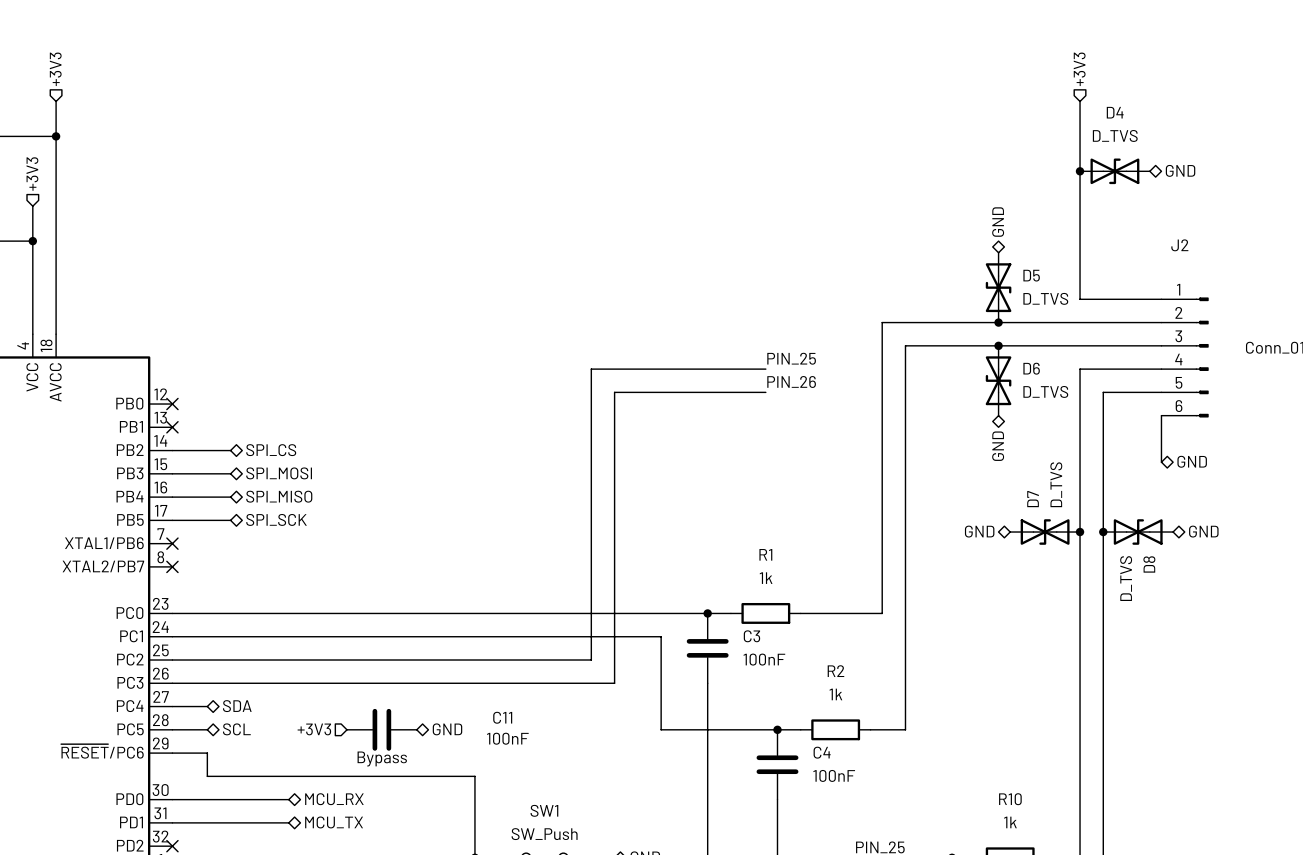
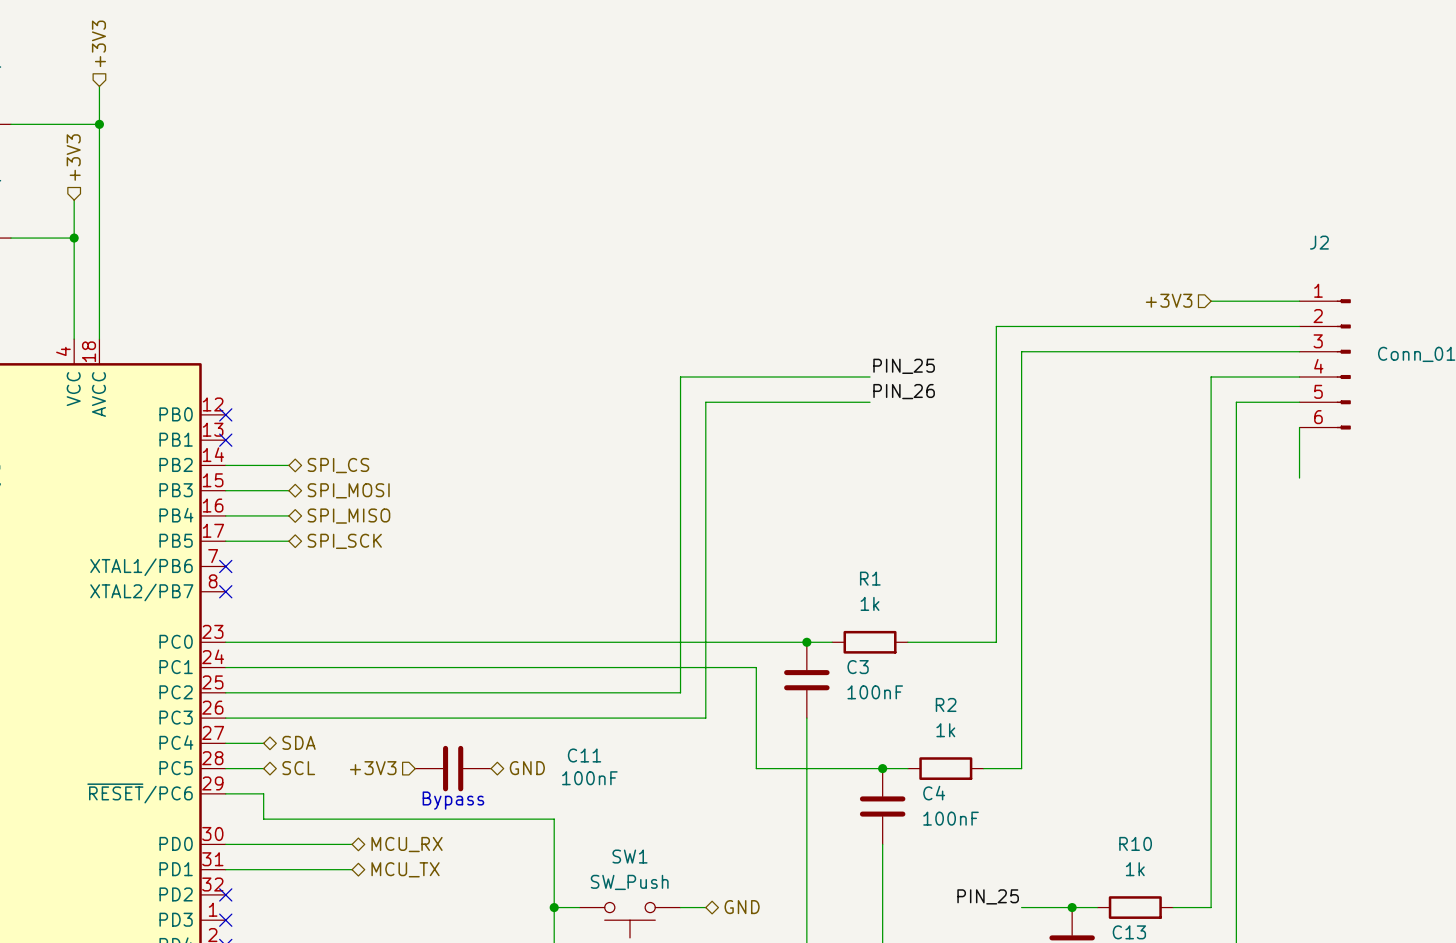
hierarchical label rotation: 0° (1079, 69) -> 90° counterclockwise (1169, 300)
hierarchical label position: +3V3 (1079, 69) -> +3V3 (1169, 300)
wire: (1080, 101) (1080, 299) -> none
hierarchical label: GND (1180, 170) -> none
junction: (1080, 171) -> none
D4: D_TVS (1114, 171) -> none
hierarchical label: GND (998, 222) -> none
D5: D_TVS (998, 287) -> none
junction: (998, 322) -> none
junction: (998, 345) -> none
D6: D_TVS (998, 380) -> none
hierarchical label: GND (998, 446) -> none
hierarchical label: GND (1192, 461) -> none
hierarchical label: GND (979, 531) -> none
hierarchical label: GND (1203, 531) -> none
D7: D_TVS (1045, 532) -> none
junction: (1080, 532) -> none
junction: (1103, 532) -> none
D8: D_TVS (1138, 532) -> none

